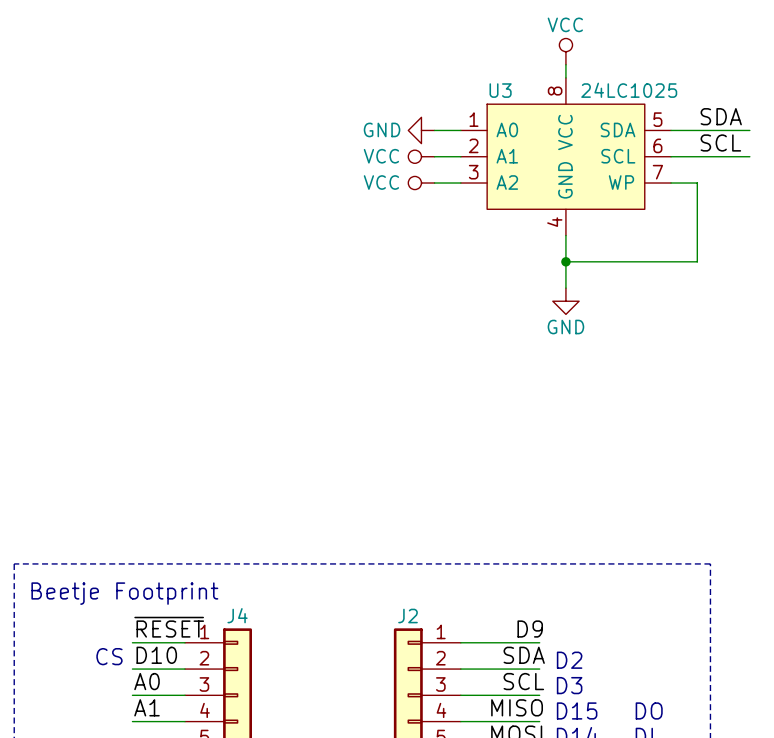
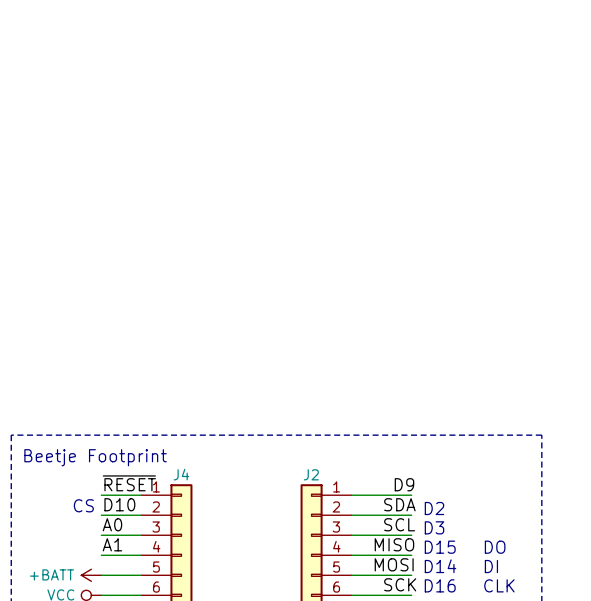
power symbol: VCC (565, 51) -> none
wire: (565, 64) (565, 77) -> none
label: SDA (721, 116) -> none
power symbol: GND (421, 130) -> none
wire: (434, 130) (460, 130) -> none
wire: (671, 130) (749, 130) -> none
label: SCL (720, 142) -> none
power symbol: VCC (421, 156) -> none
wire: (434, 156) (460, 156) -> none
U3: 24LC1025 (565, 156) -> none
wire: (671, 156) (749, 156) -> none
power symbol: VCC (421, 183) -> none
wire: (434, 183) (460, 183) -> none
wire: (671, 183) (697, 183) (697, 261) (565, 261) -> none
wire: (565, 235) (565, 288) -> none
junction: (565, 261) -> none
power symbol: GND (565, 301) -> none

